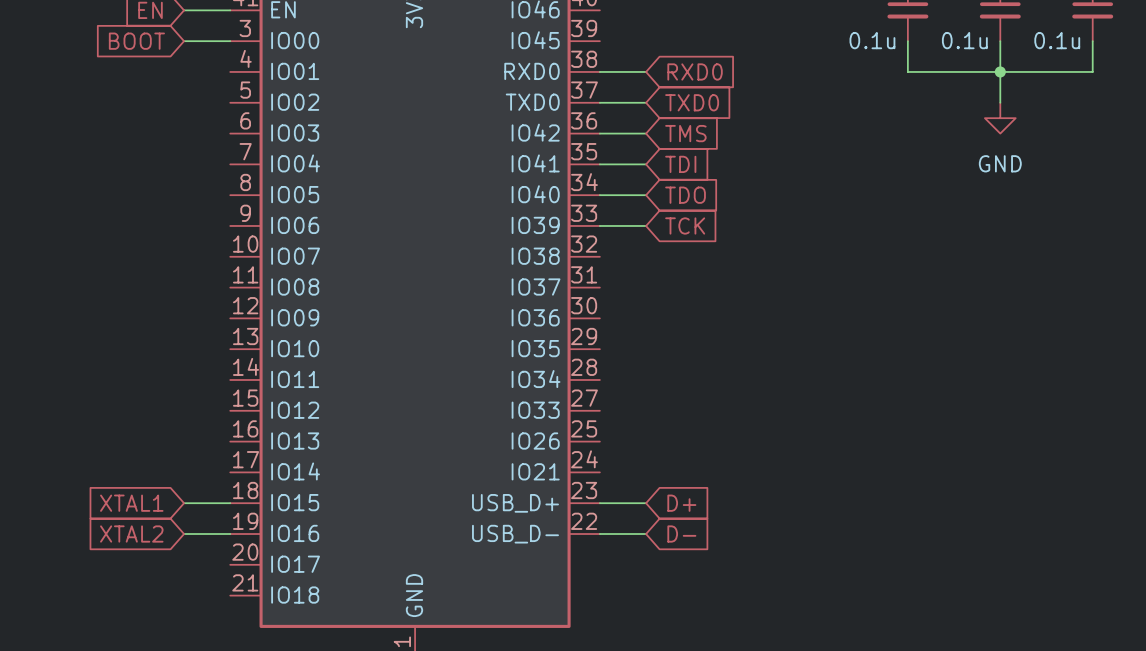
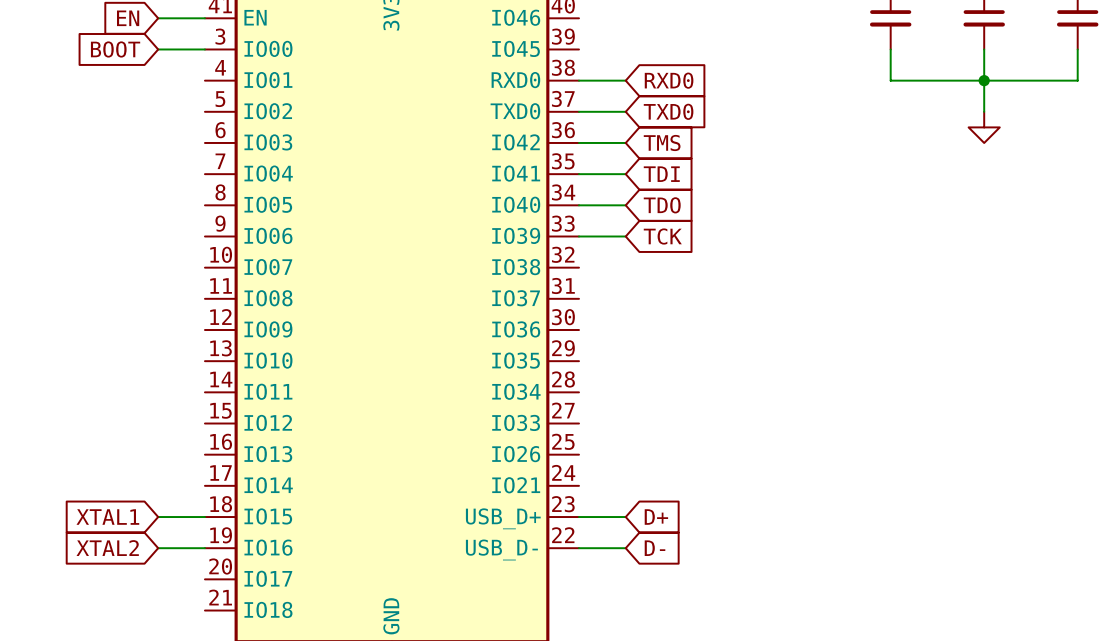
part value: 0.1u (872, 40) -> none
part value: 0.1u (964, 40) -> none
part value: 0.1u (1057, 40) -> none
power symbol text: GND (1000, 163) -> none

